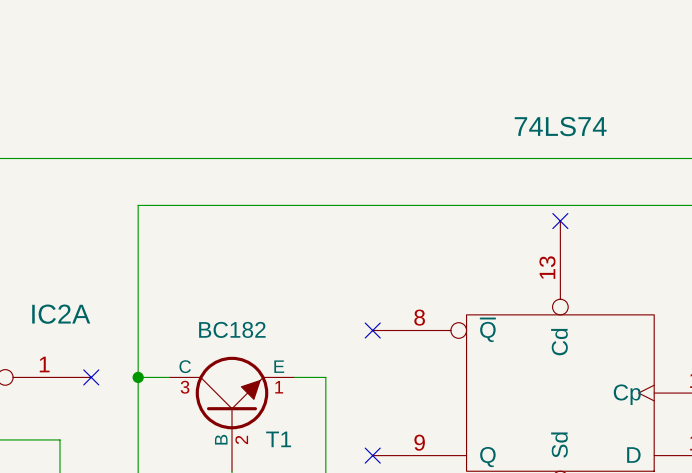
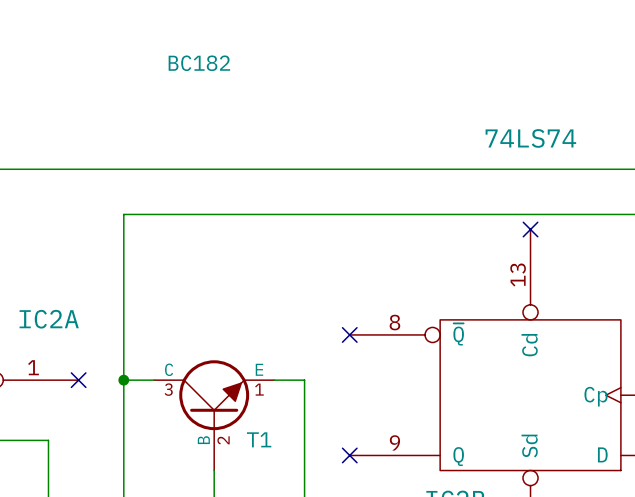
T1 value position: BC182 (232, 329) -> BC182 (199, 63)

